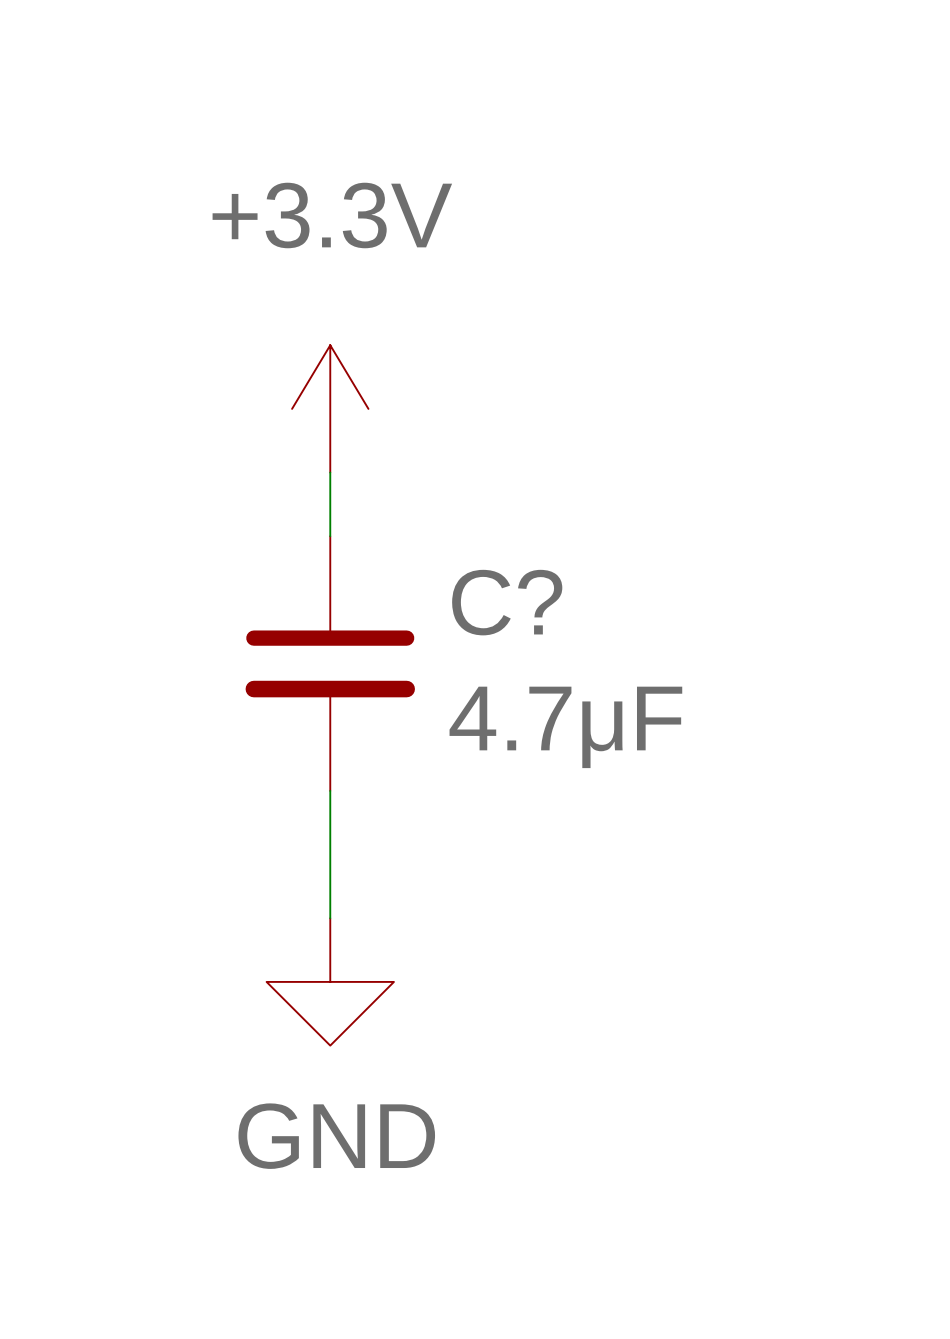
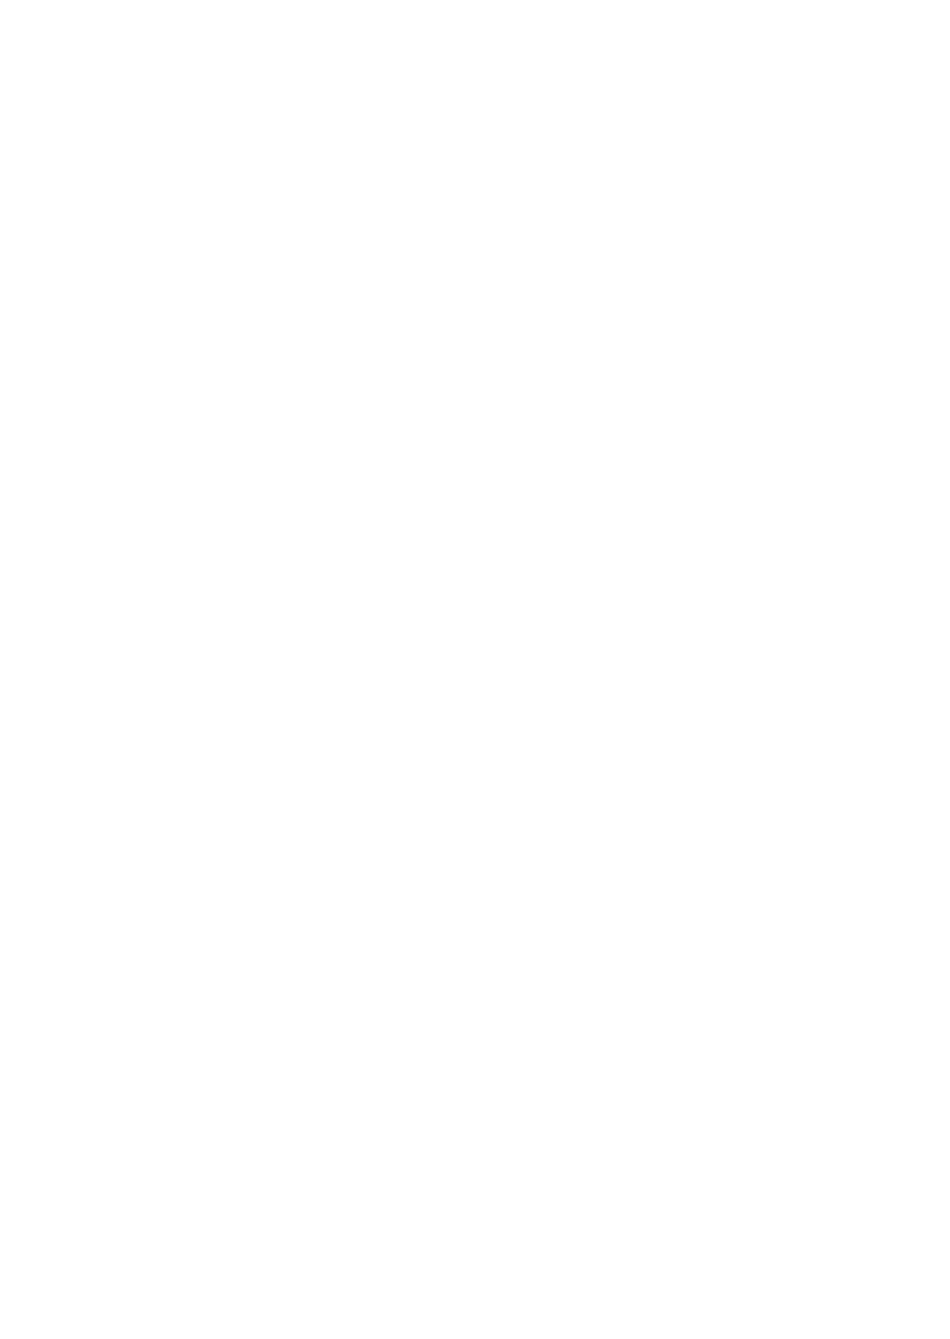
power symbol: +3.3V (330, 408) -> none
wire: (330, 472) (330, 536) -> none
C?: 4.7μF (330, 663) -> none
wire: (330, 790) (330, 918) -> none
power symbol: GND (330, 981) -> none

